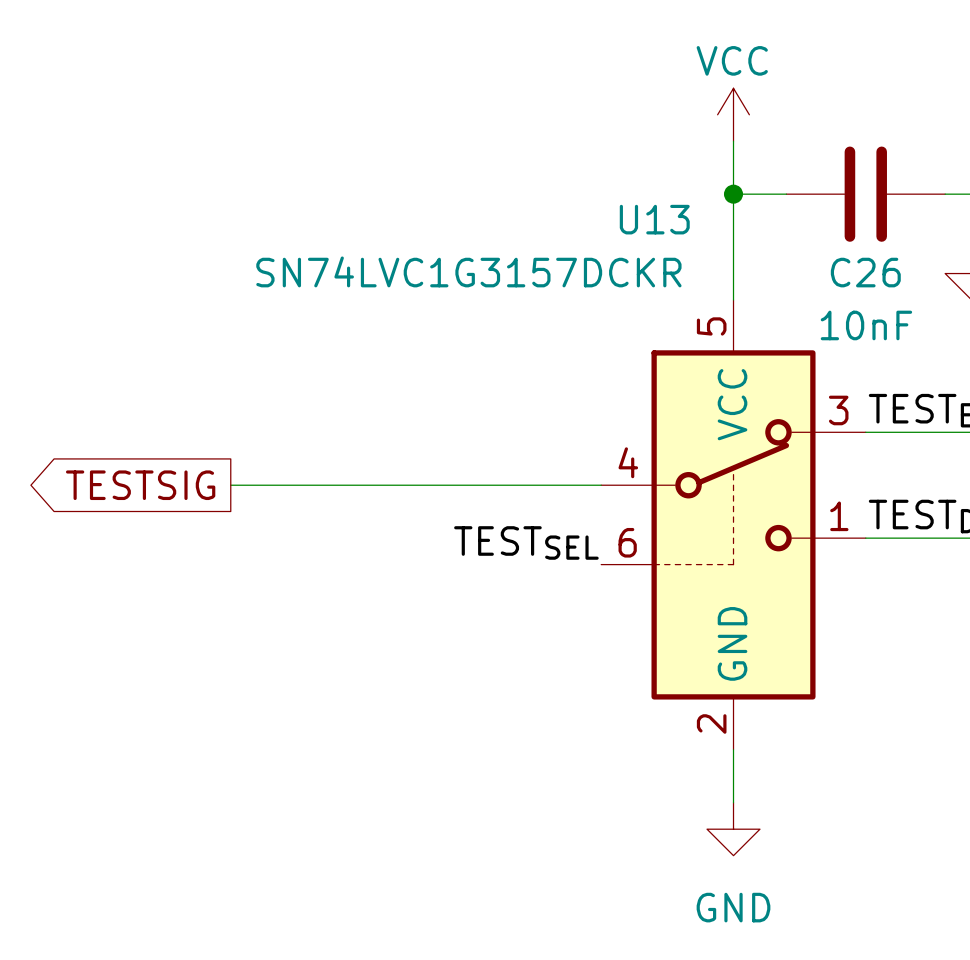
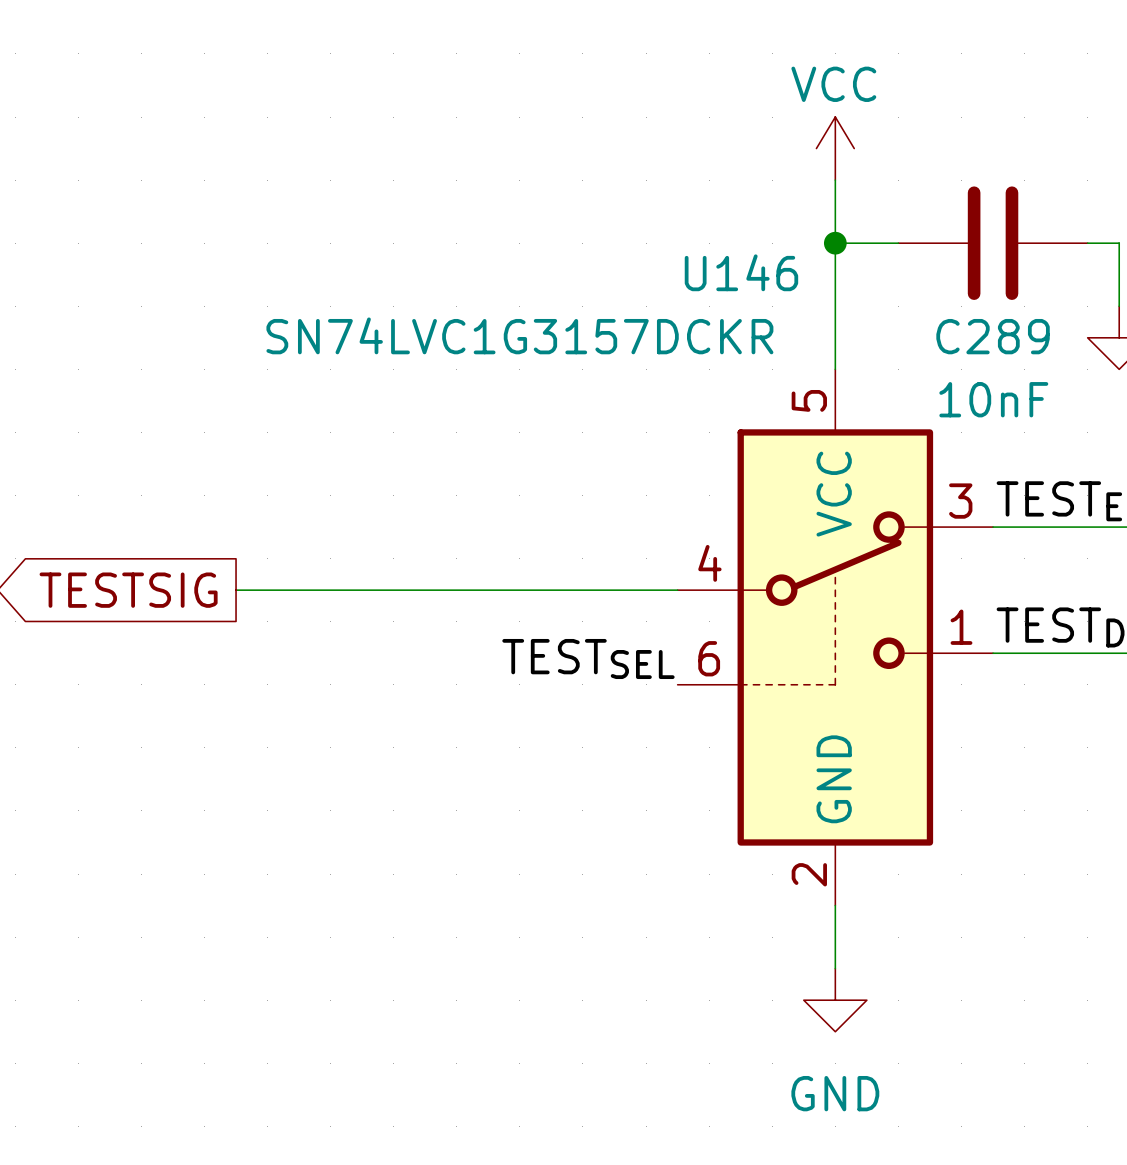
U13 name: U13 (654, 219) -> U146 (741, 272)
C26 name: C26 (865, 272) -> C289 (993, 336)

